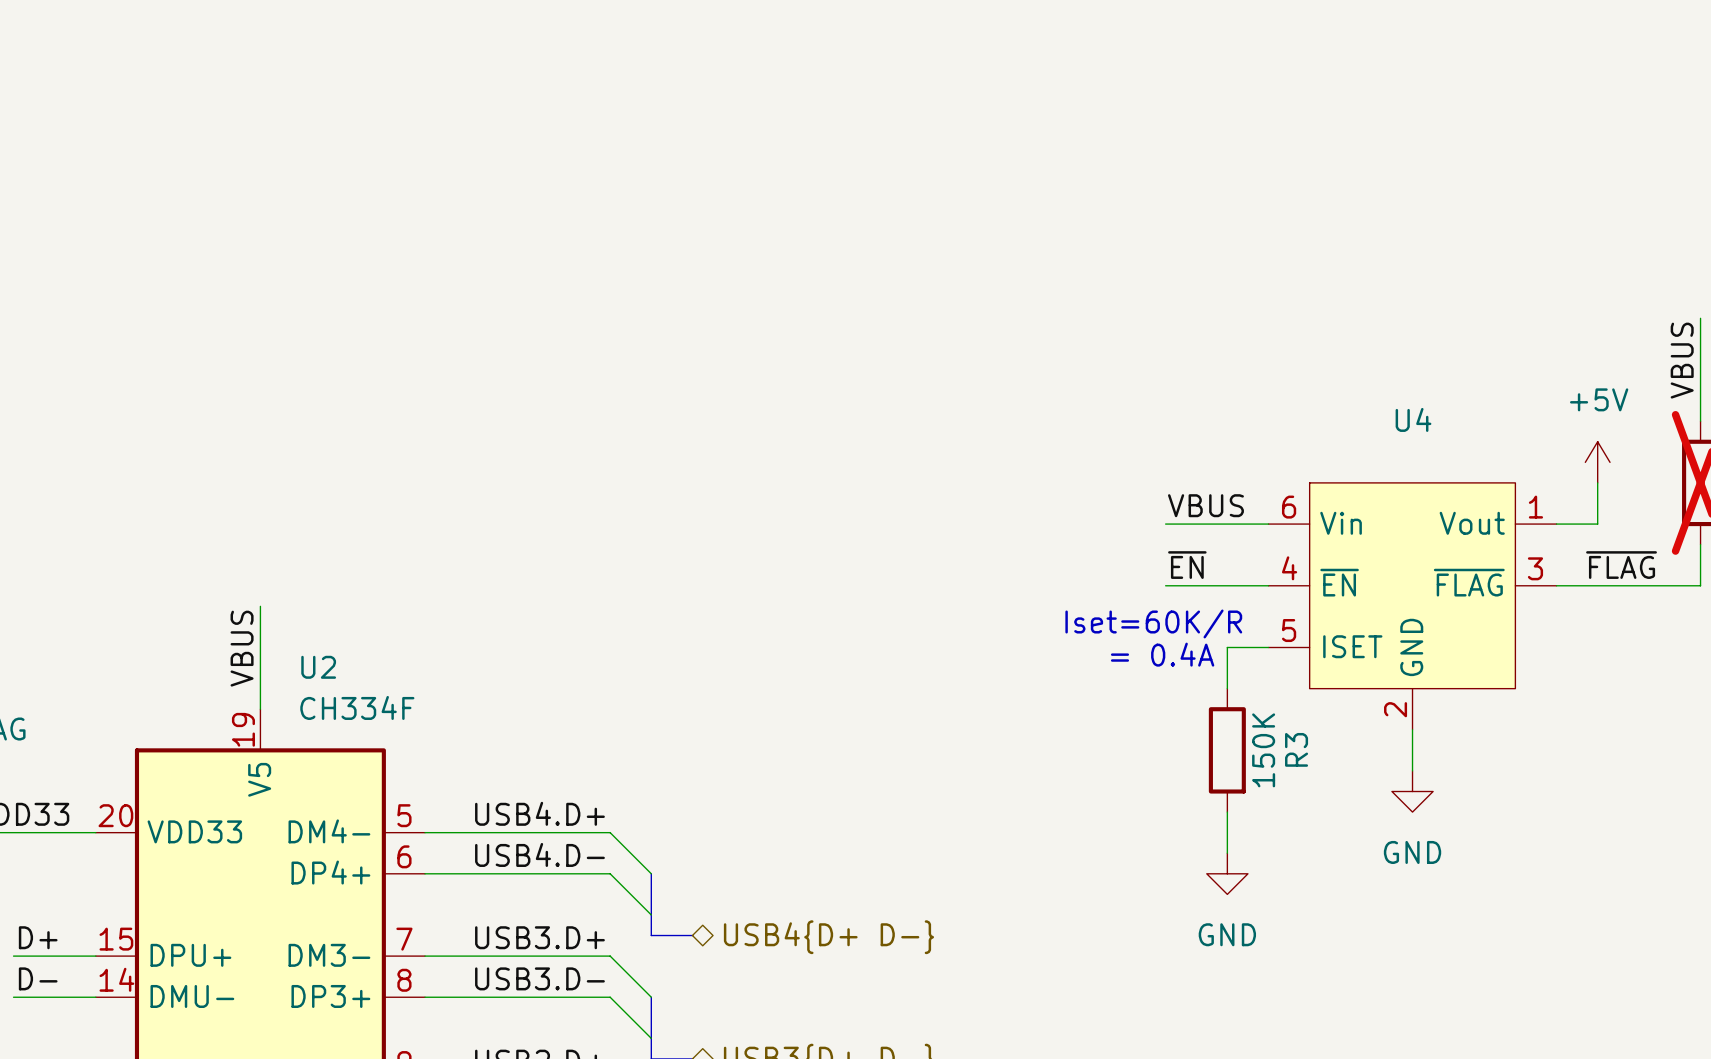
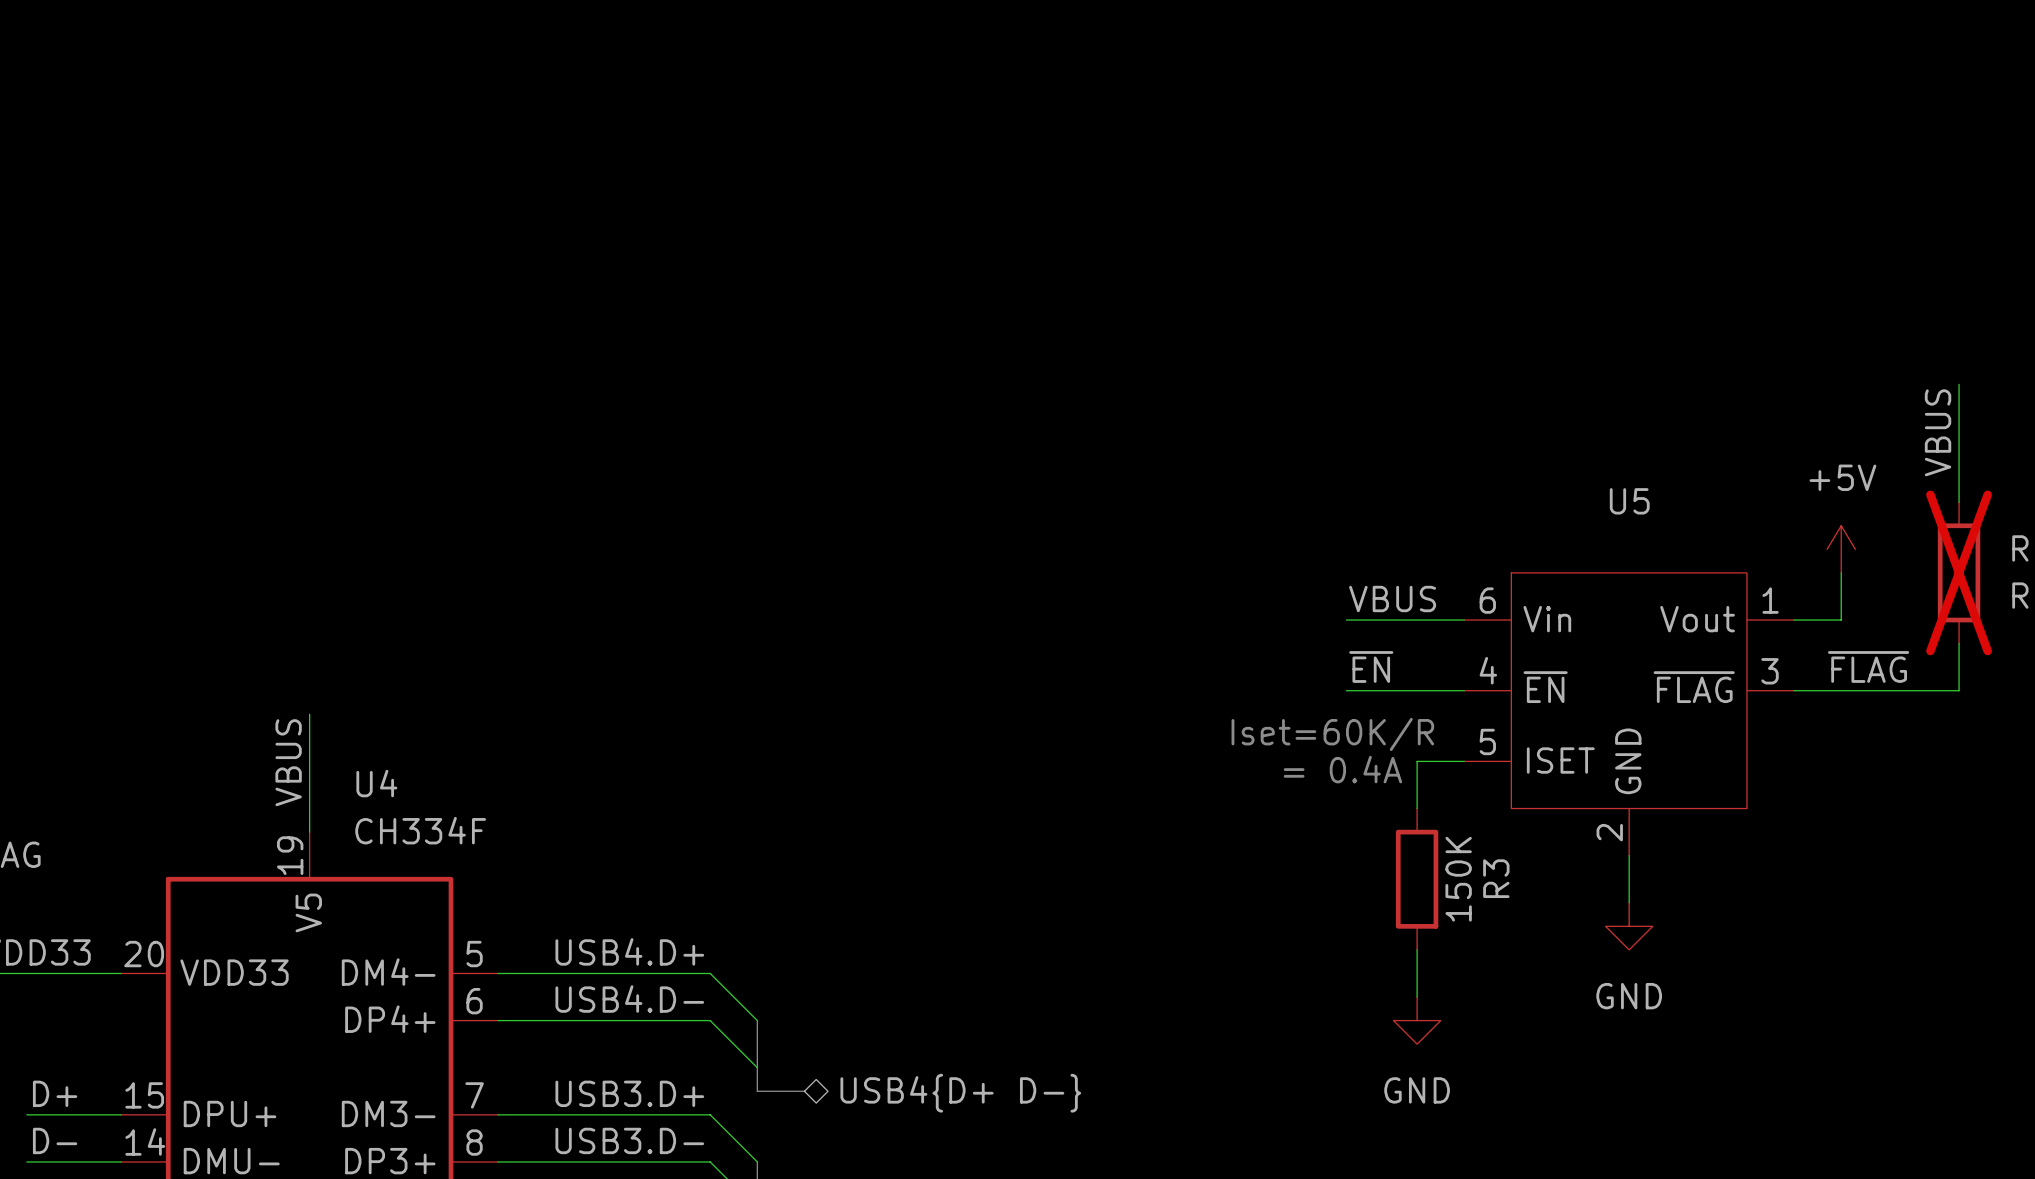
U4 name: U4 (1413, 419) -> U5 (1629, 501)
U2 name: U2 (318, 667) -> U4 (376, 783)

